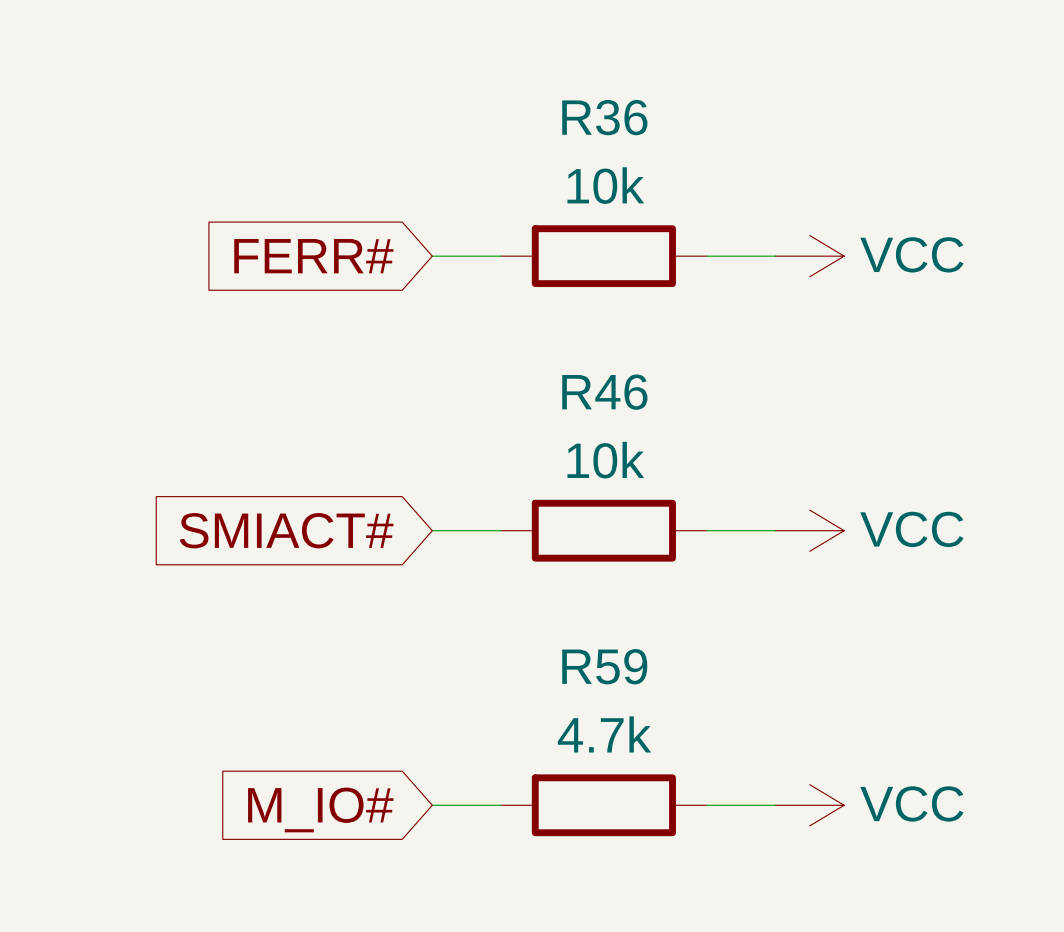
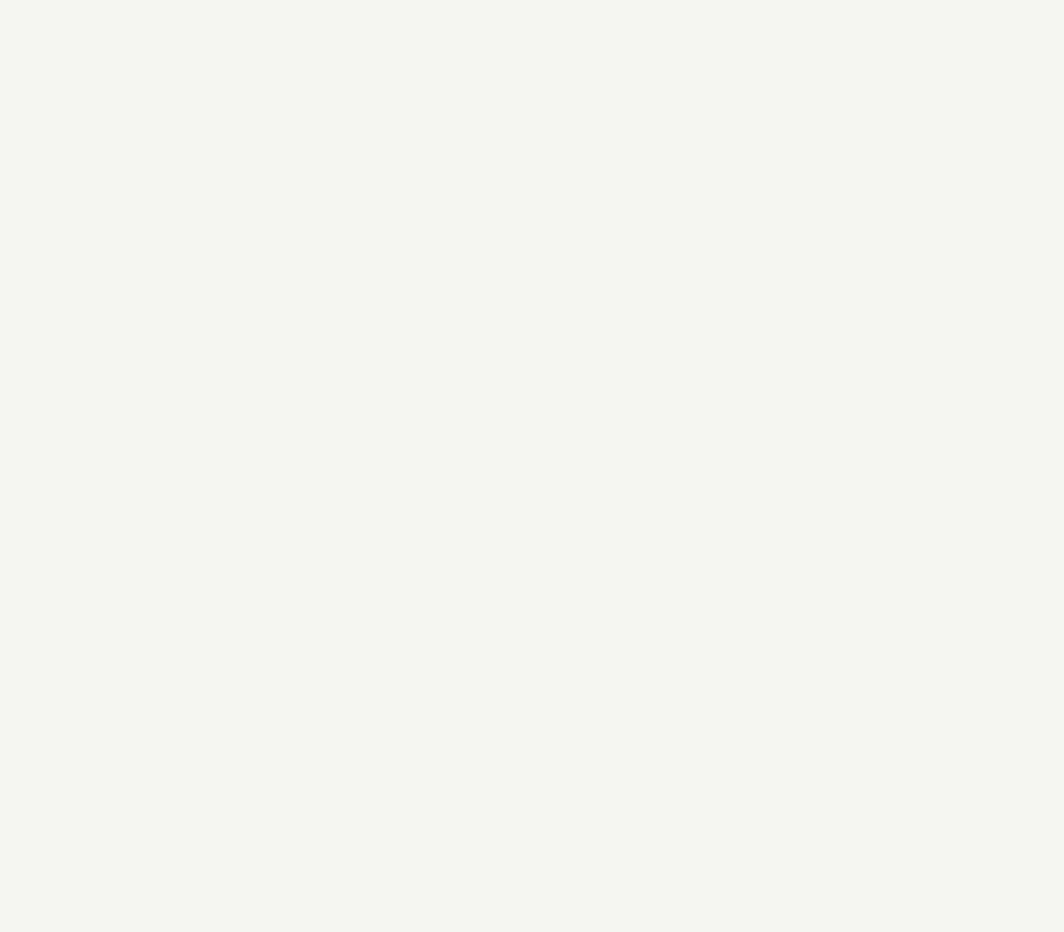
global label: FERR# (313, 256) -> none
wire: (432, 256) (500, 256) -> none
R36: 10k (603, 256) -> none
wire: (706, 256) (775, 256) -> none
power symbol: VCC (809, 256) -> none
global label: SMIACT# (286, 530) -> none
wire: (432, 530) (500, 530) -> none
R46: 10k (603, 530) -> none
wire: (706, 530) (775, 530) -> none
power symbol: VCC (809, 530) -> none
wire: (432, 805) (500, 805) -> none
R59: 4.7k (603, 805) -> none
wire: (706, 805) (775, 805) -> none
power symbol: VCC (809, 805) -> none
global label: M_IO# (320, 809) -> none

